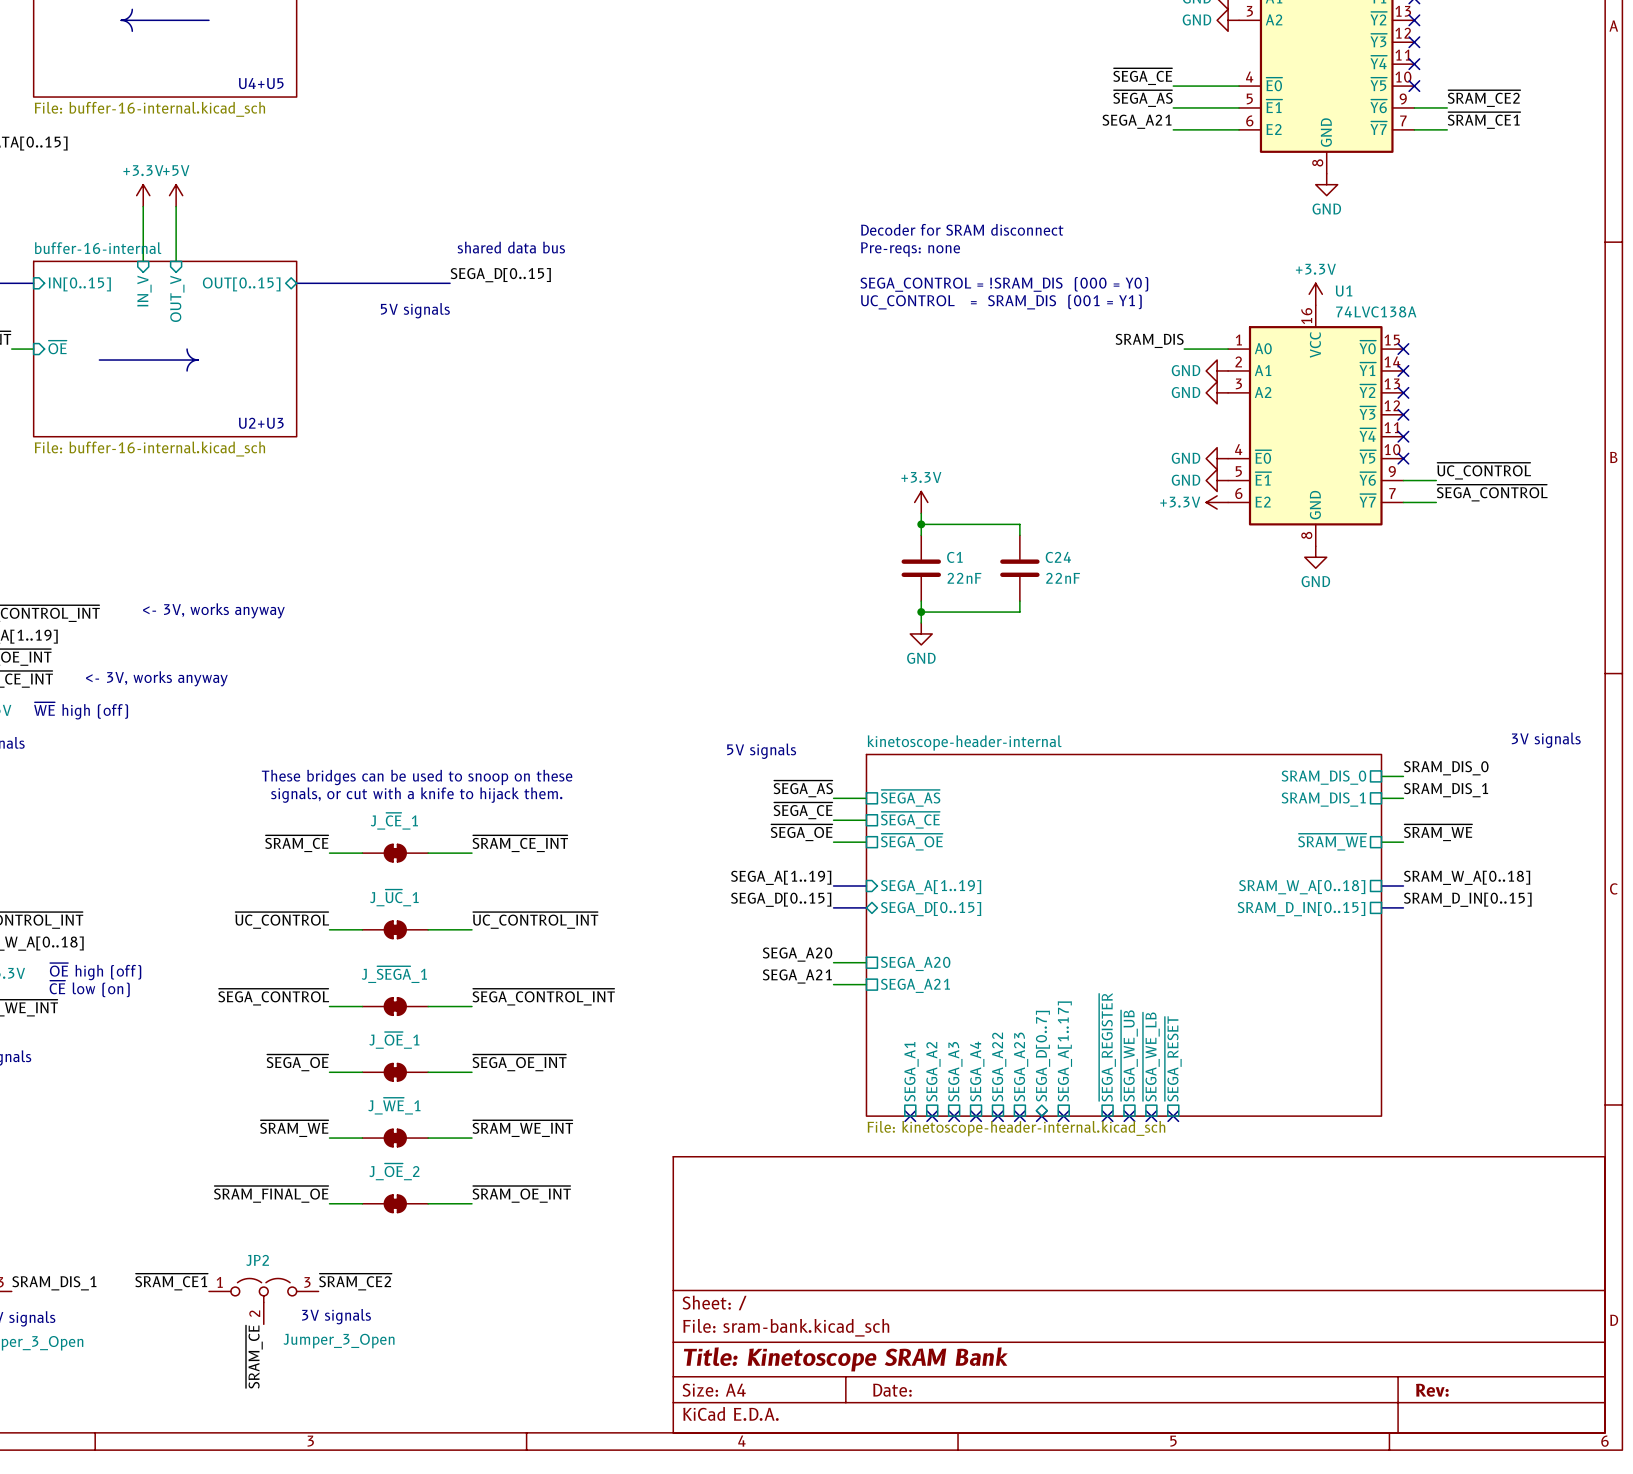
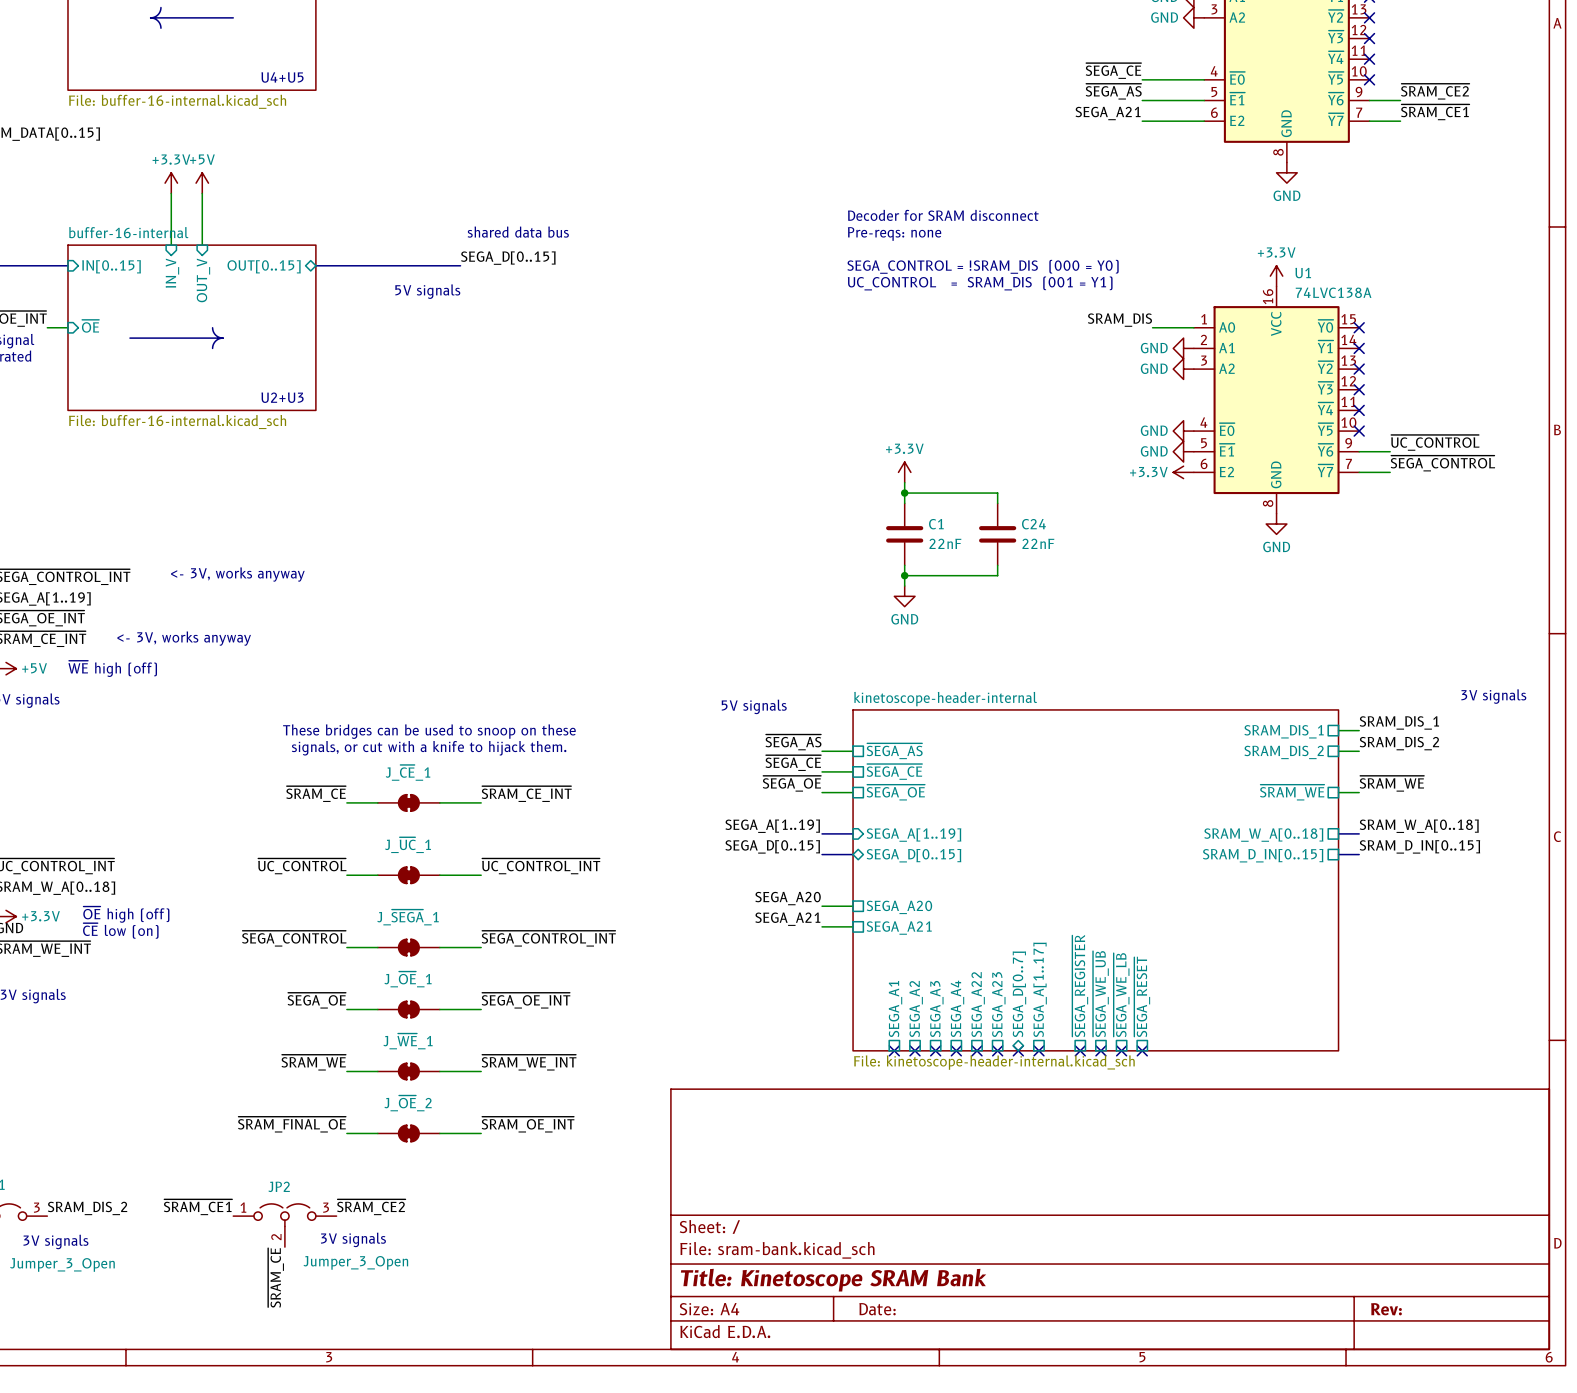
label: SRAM_DIS_0 (1446, 768) -> SRAM_DIS_1 (1399, 722)
sheet pin: SRAM_DIS_0 (1323, 777) -> SRAM_DIS_1 (1284, 731)
label: SRAM_DIS_1 (1446, 790) -> SRAM_DIS_2 (1399, 743)
sheet pin: SRAM_DIS_1 (1323, 799) -> SRAM_DIS_2 (1284, 752)
label: SRAM_DIS_1 (54, 1283) -> SRAM_DIS_2 (87, 1208)

